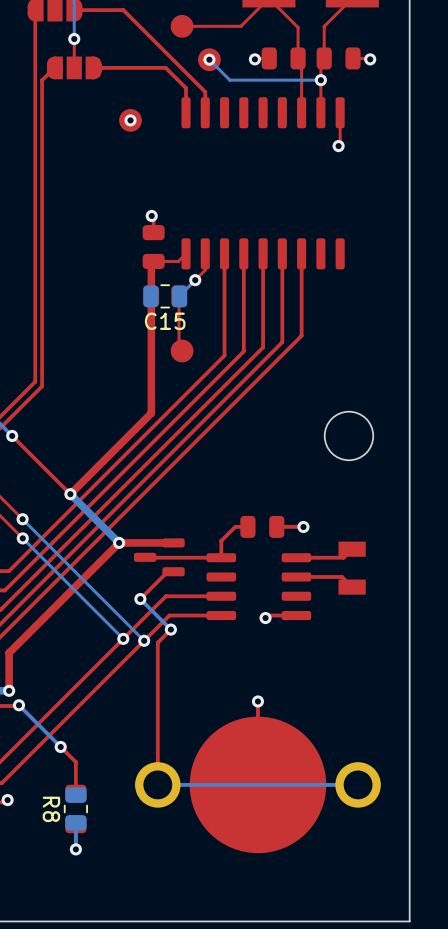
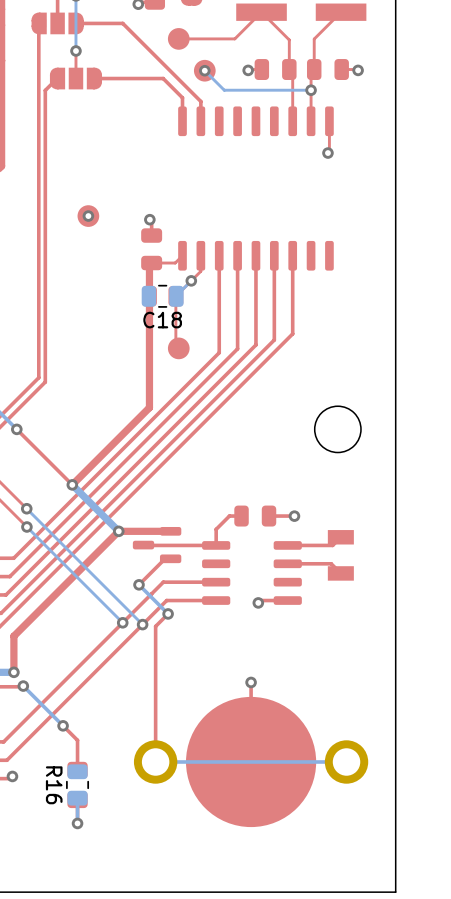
part position: (130, 120) -> (88, 216)
via: (130, 120) -> none
via: none -> (88, 216)
C15 name: C15 (165, 321) -> C18 (162, 320)
R8 name: R8 (51, 809) -> R16 (54, 785)

